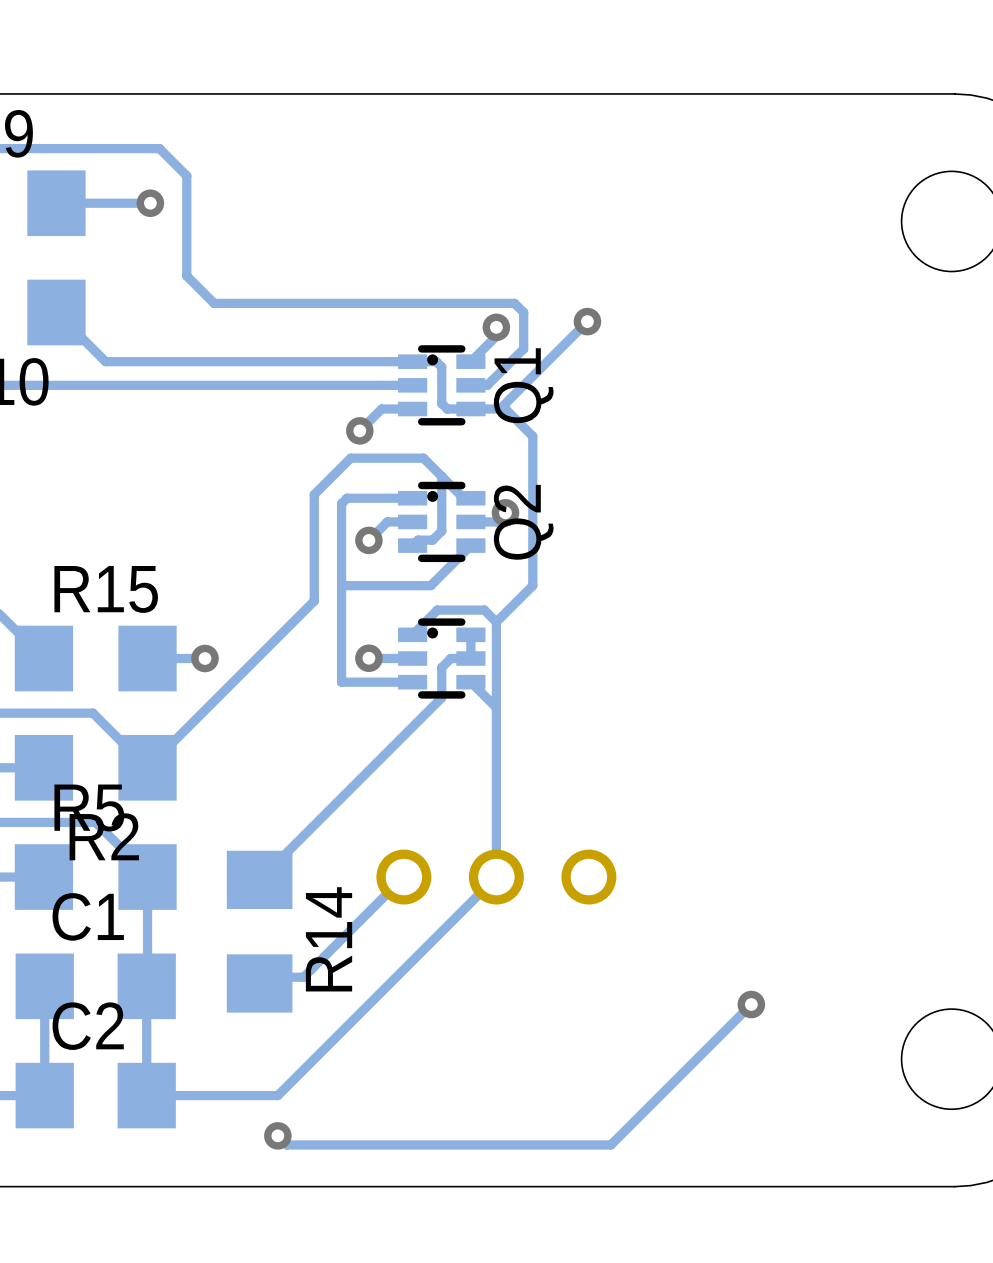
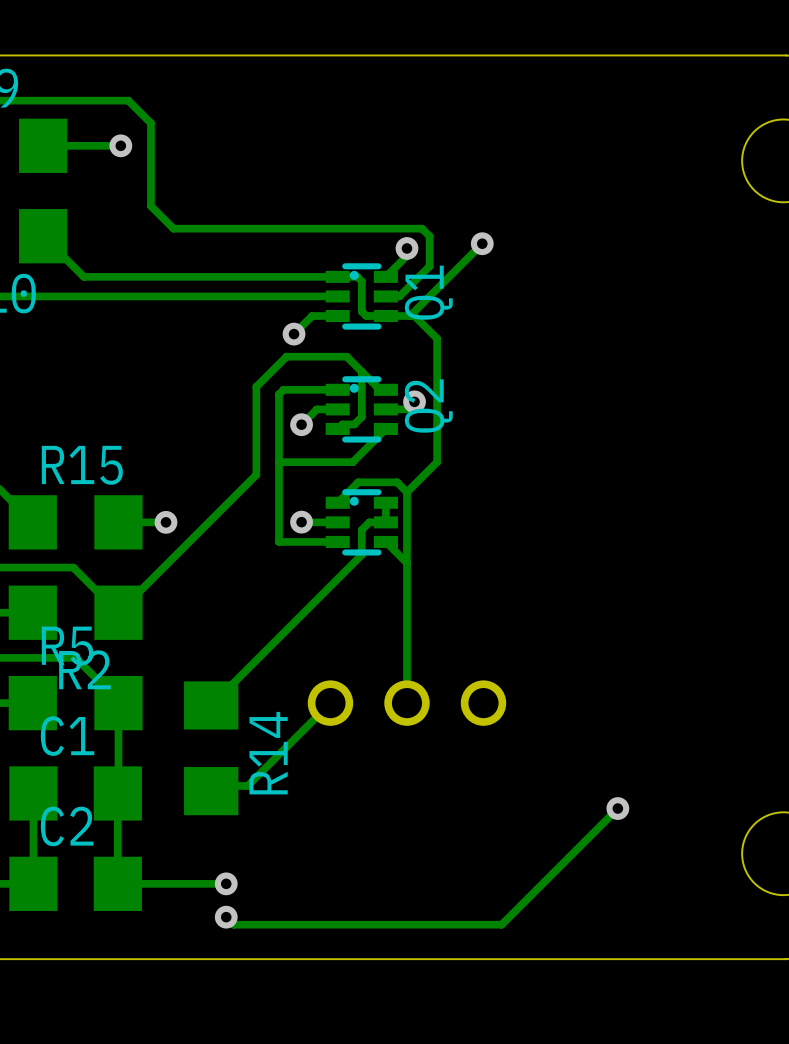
track: (496, 877) (277, 1095) -> none
via: none -> (226, 883)

